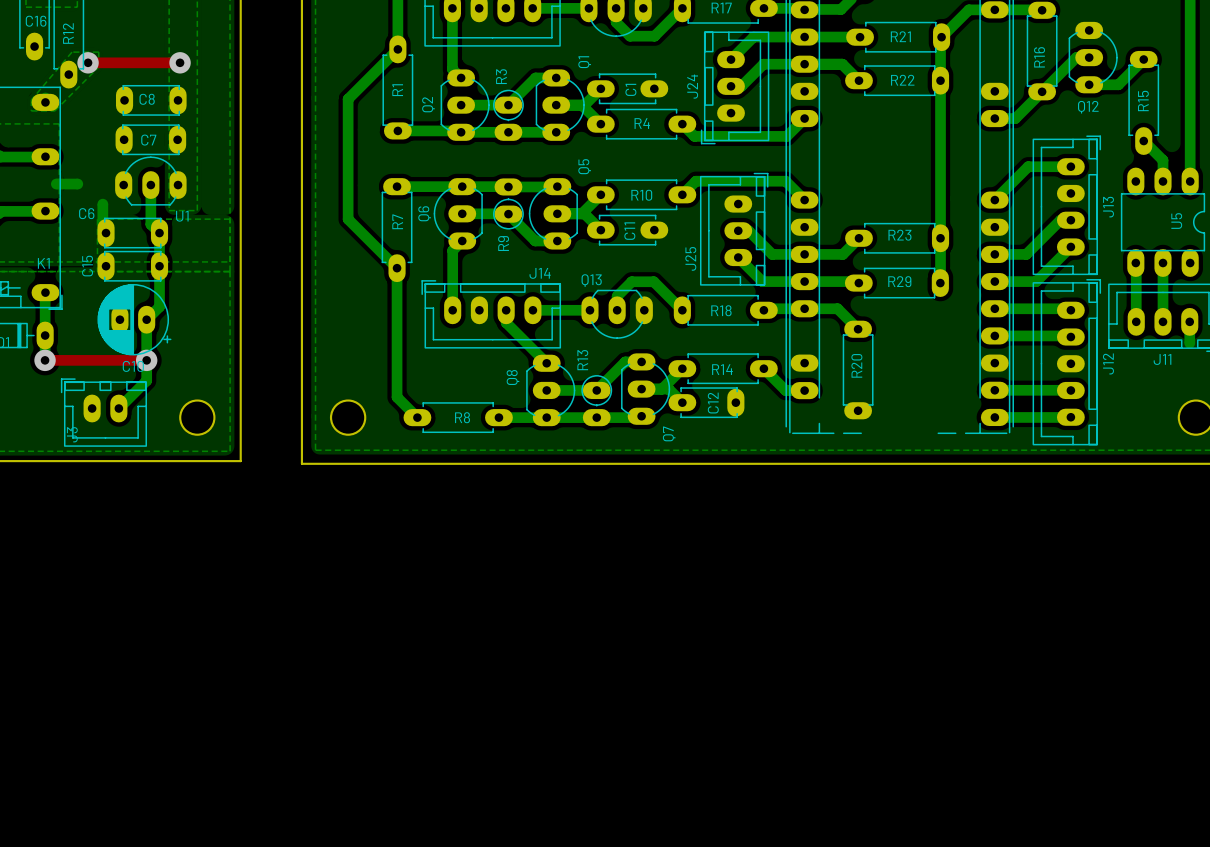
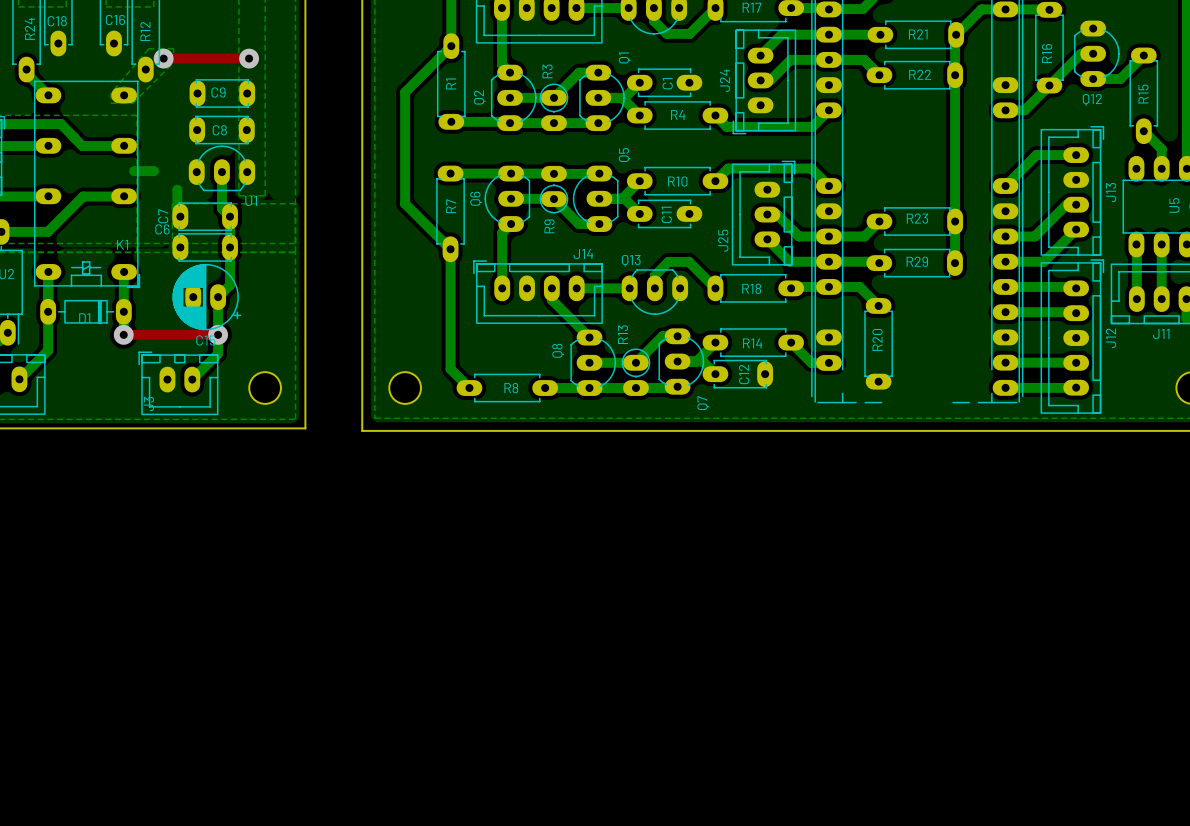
C8 name: C8 (147, 99) -> C9 (218, 92)
C7 name: C7 (148, 140) -> C8 (219, 130)
C6 name: C6 (86, 213) -> C7 (163, 216)
C15 name: C15 (87, 266) -> C6 (162, 229)
C10 name: C10 (133, 366) -> C15 (205, 340)

